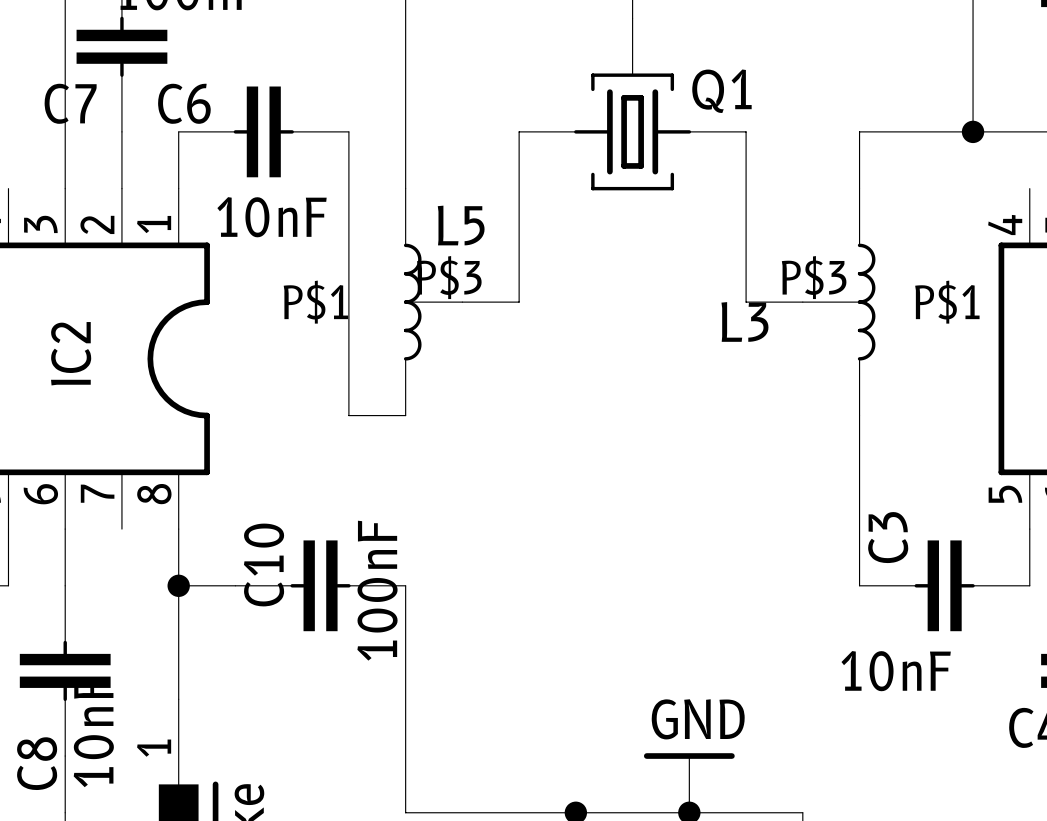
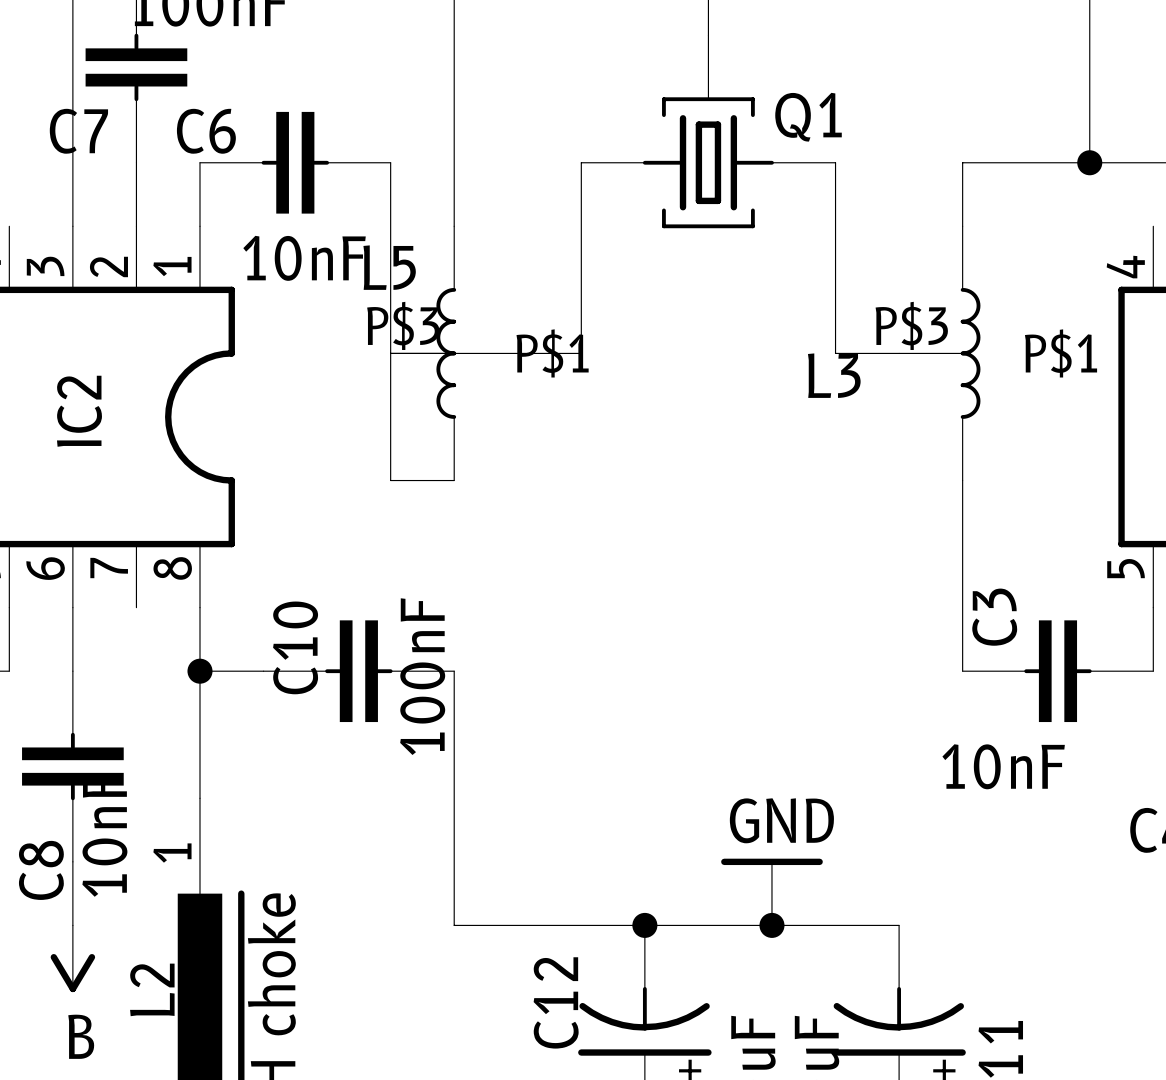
L5 name position: L5 (461, 225) -> L5 (389, 267)
L5 rotation: 0° (412, 302) -> 180° (446, 353)

